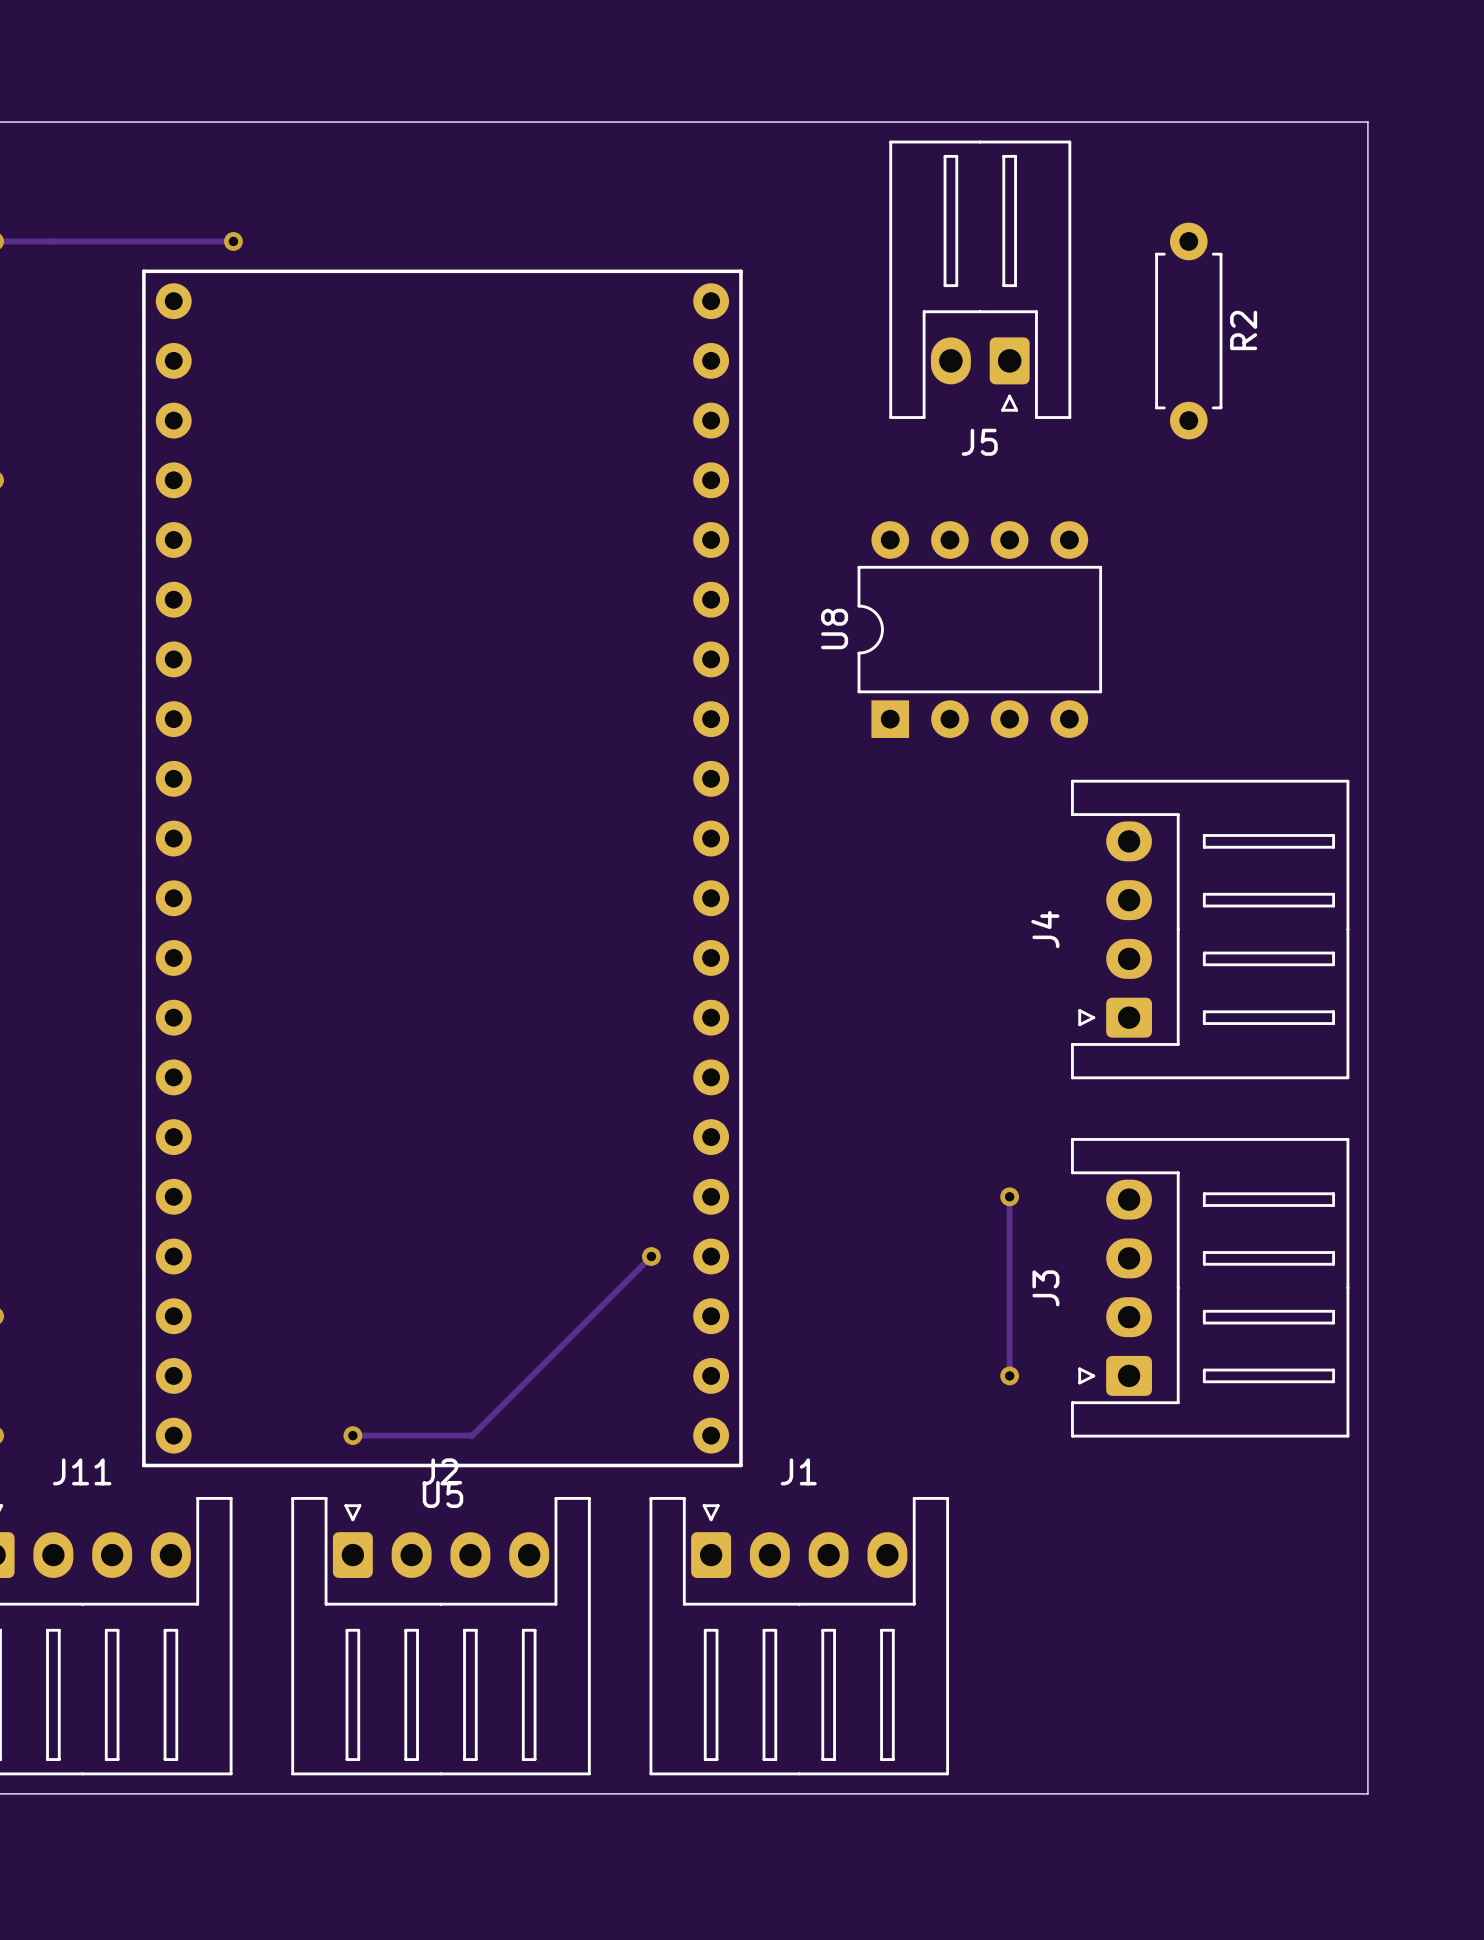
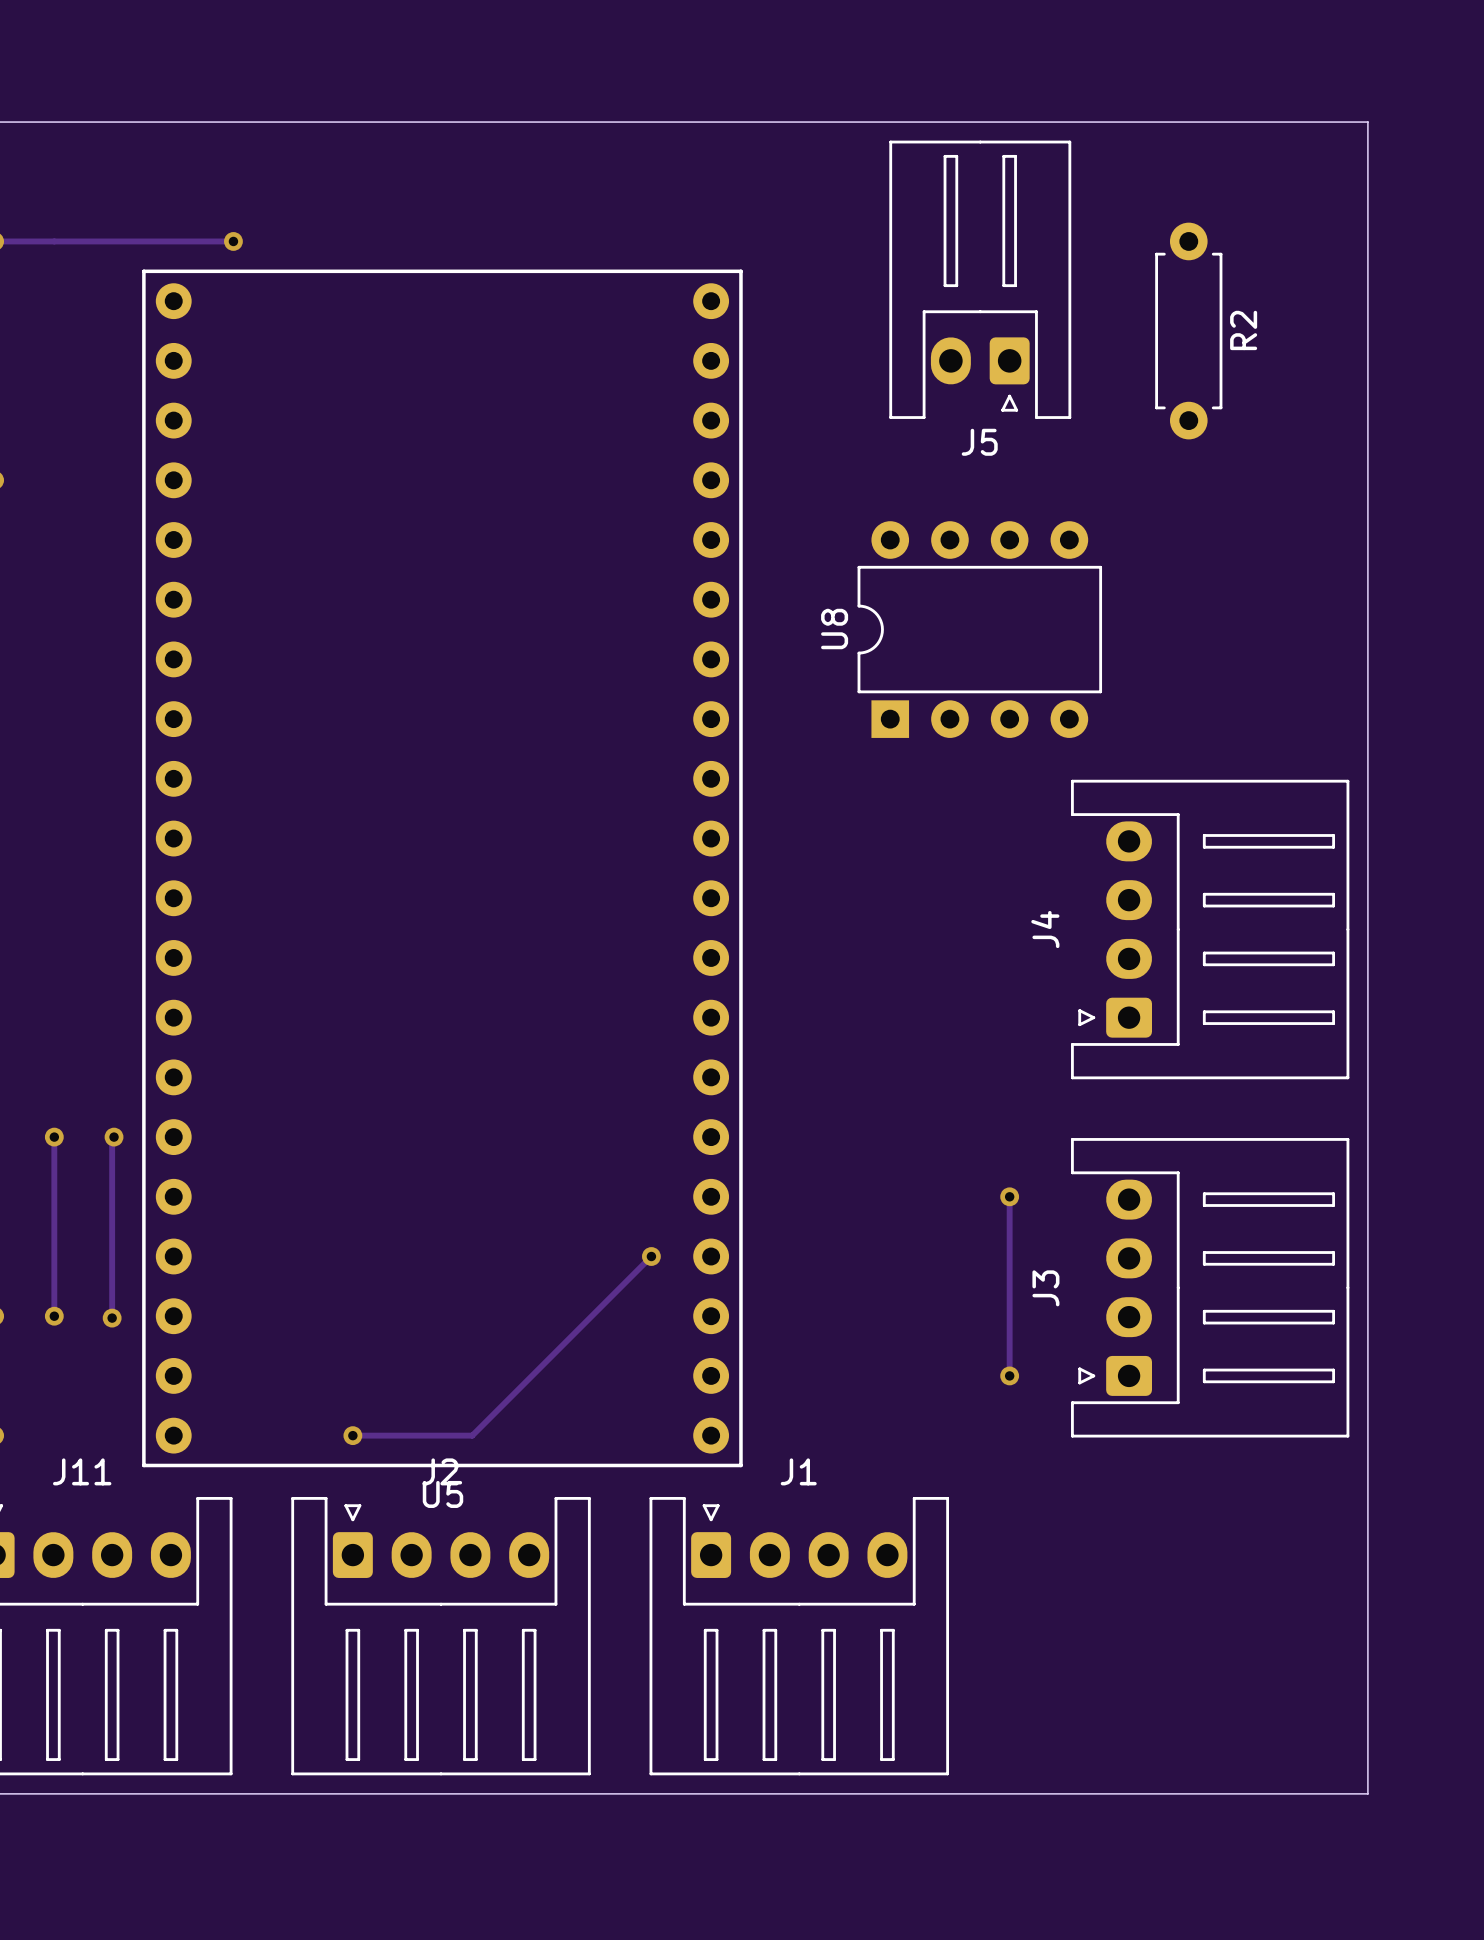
track: none -> (54, 1137) (54, 1316)
via: none -> (54, 1137)
via: none -> (114, 1137)
track: none -> (112, 1138) (112, 1318)
via: none -> (54, 1316)
via: none -> (112, 1318)

